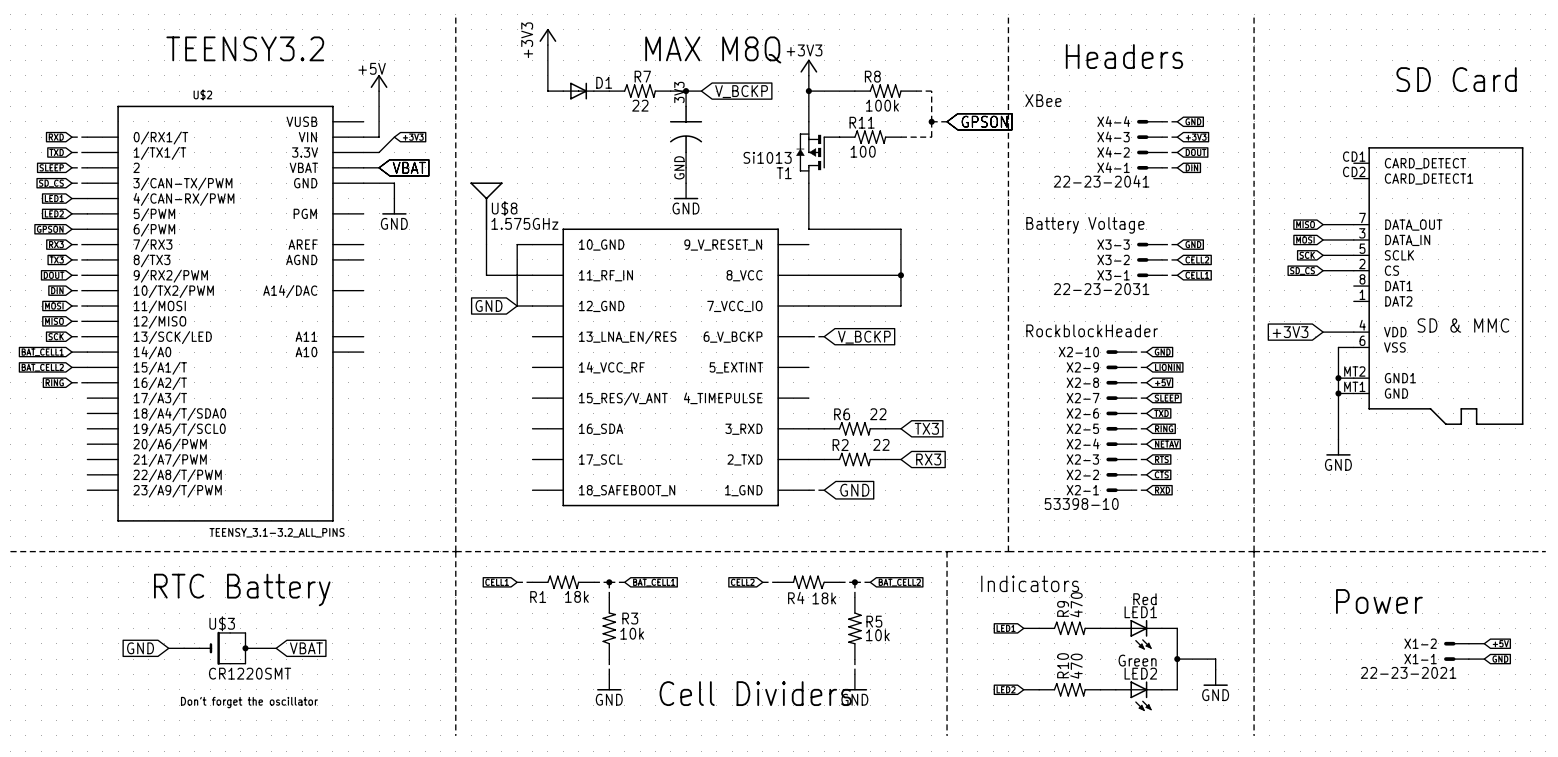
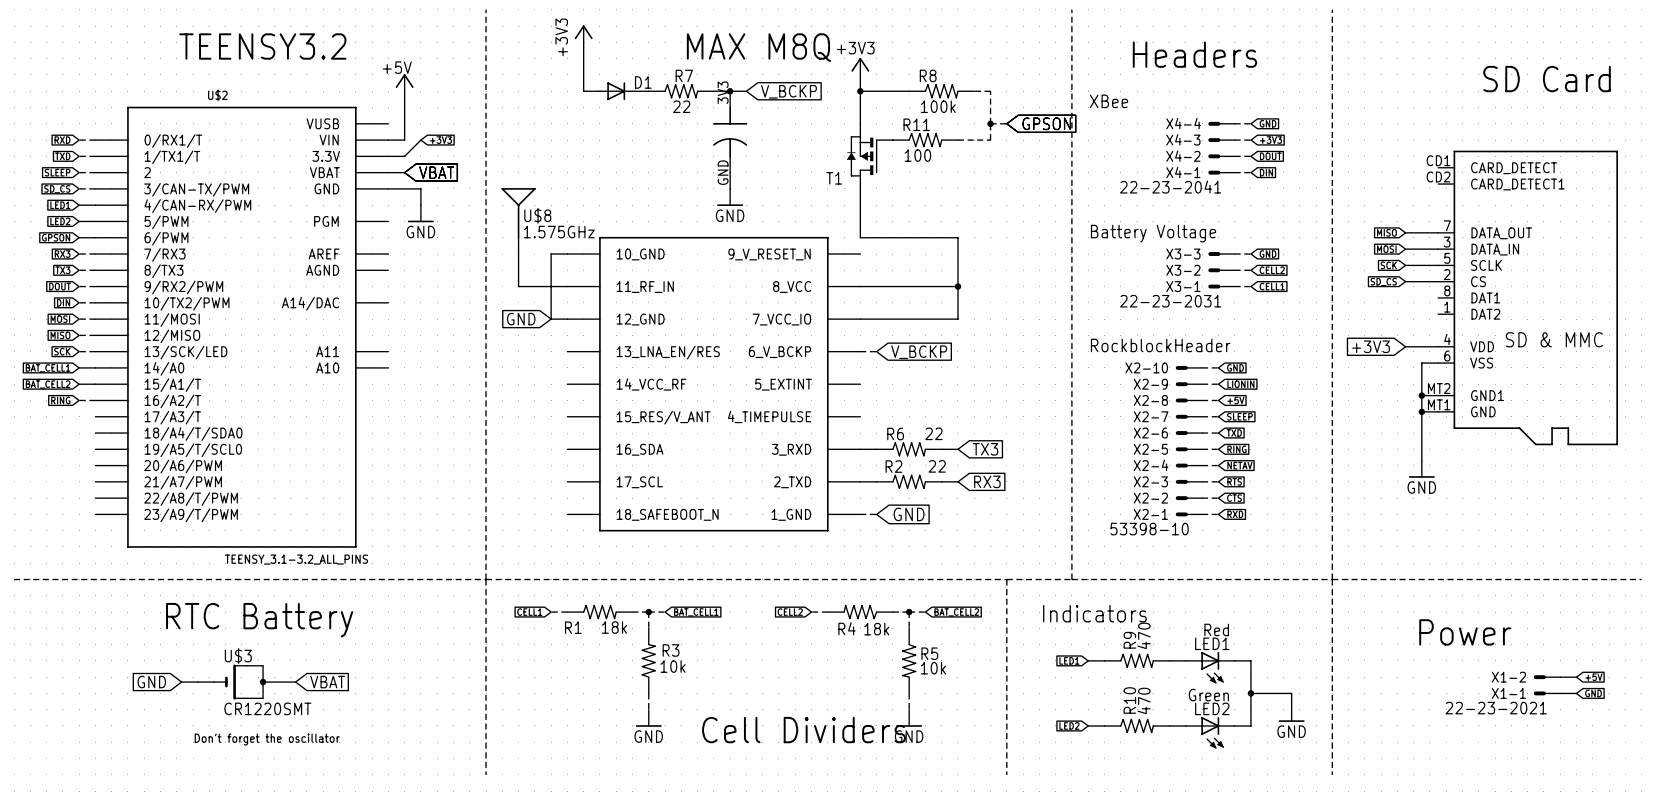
T1 value: Si1013 (767, 157) -> none

